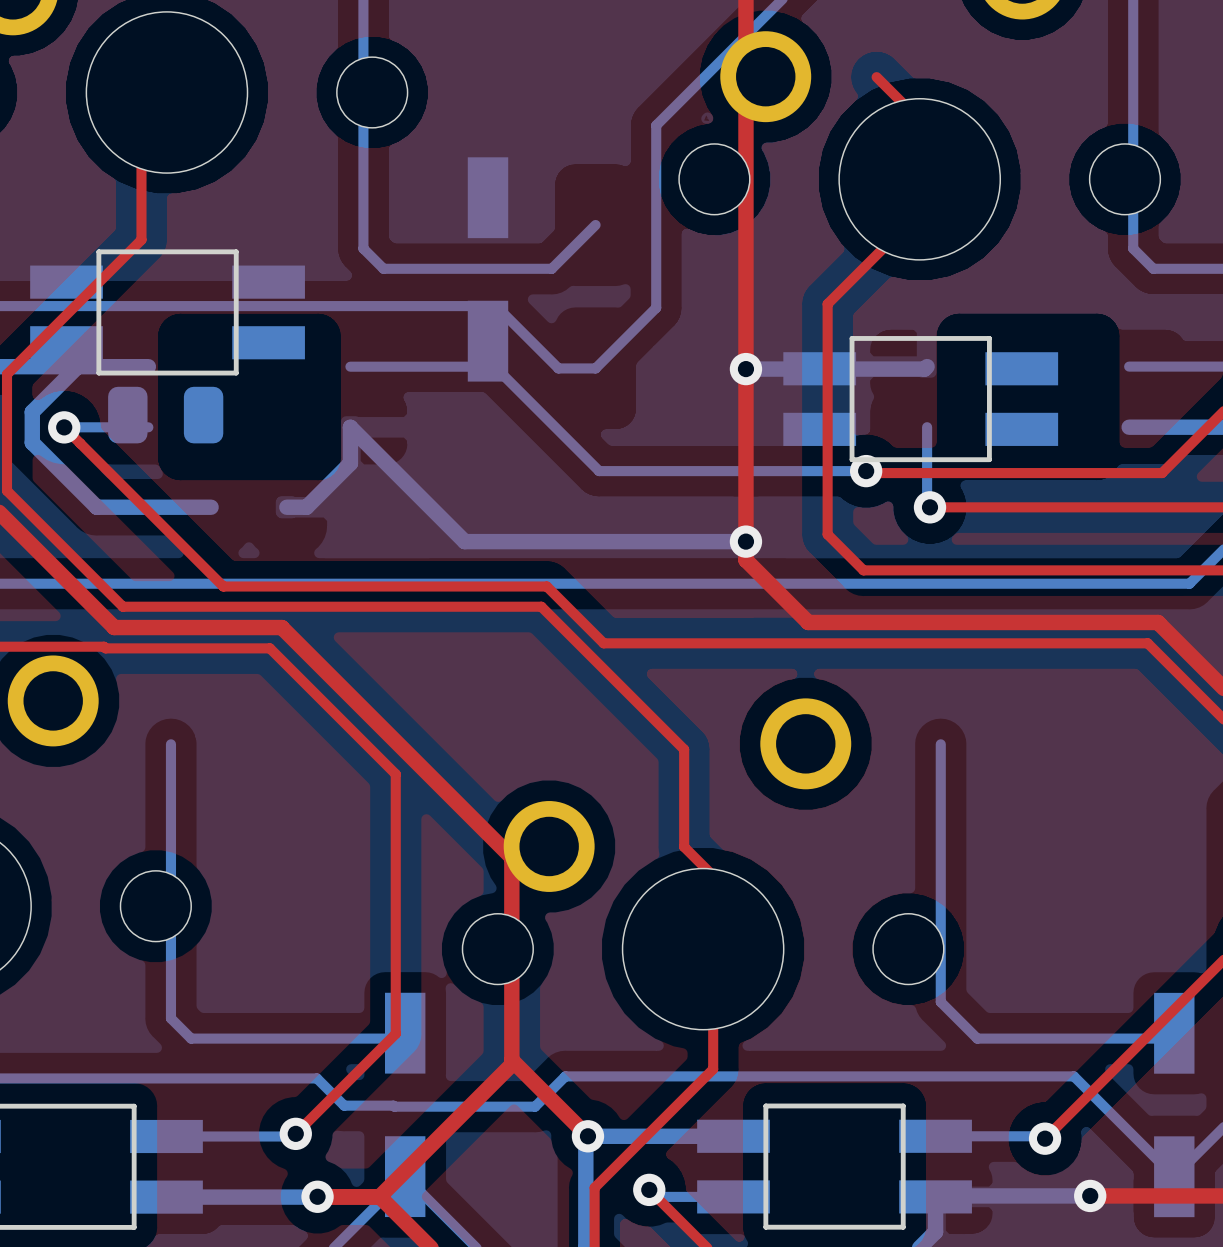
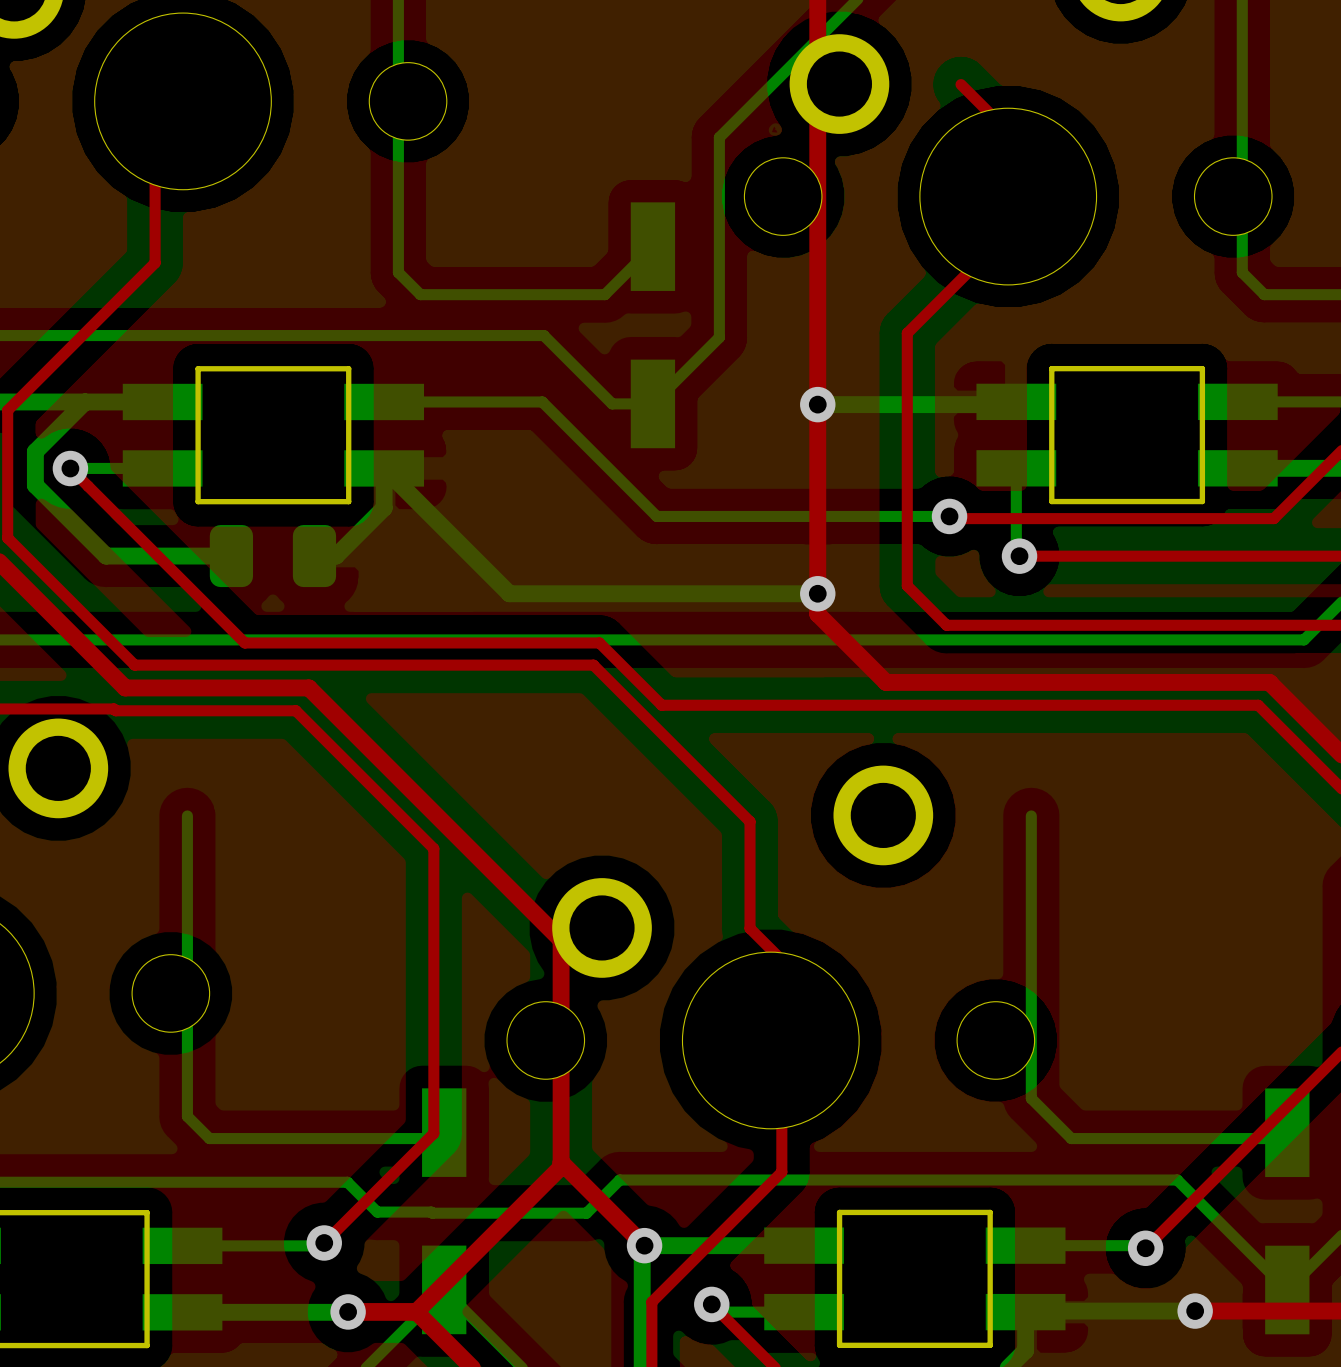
part position: (487, 269) -> (652, 325)
part position: (167, 312) -> (273, 435)
part position: (920, 399) -> (1127, 435)
part position: (165, 415) -> (272, 556)

